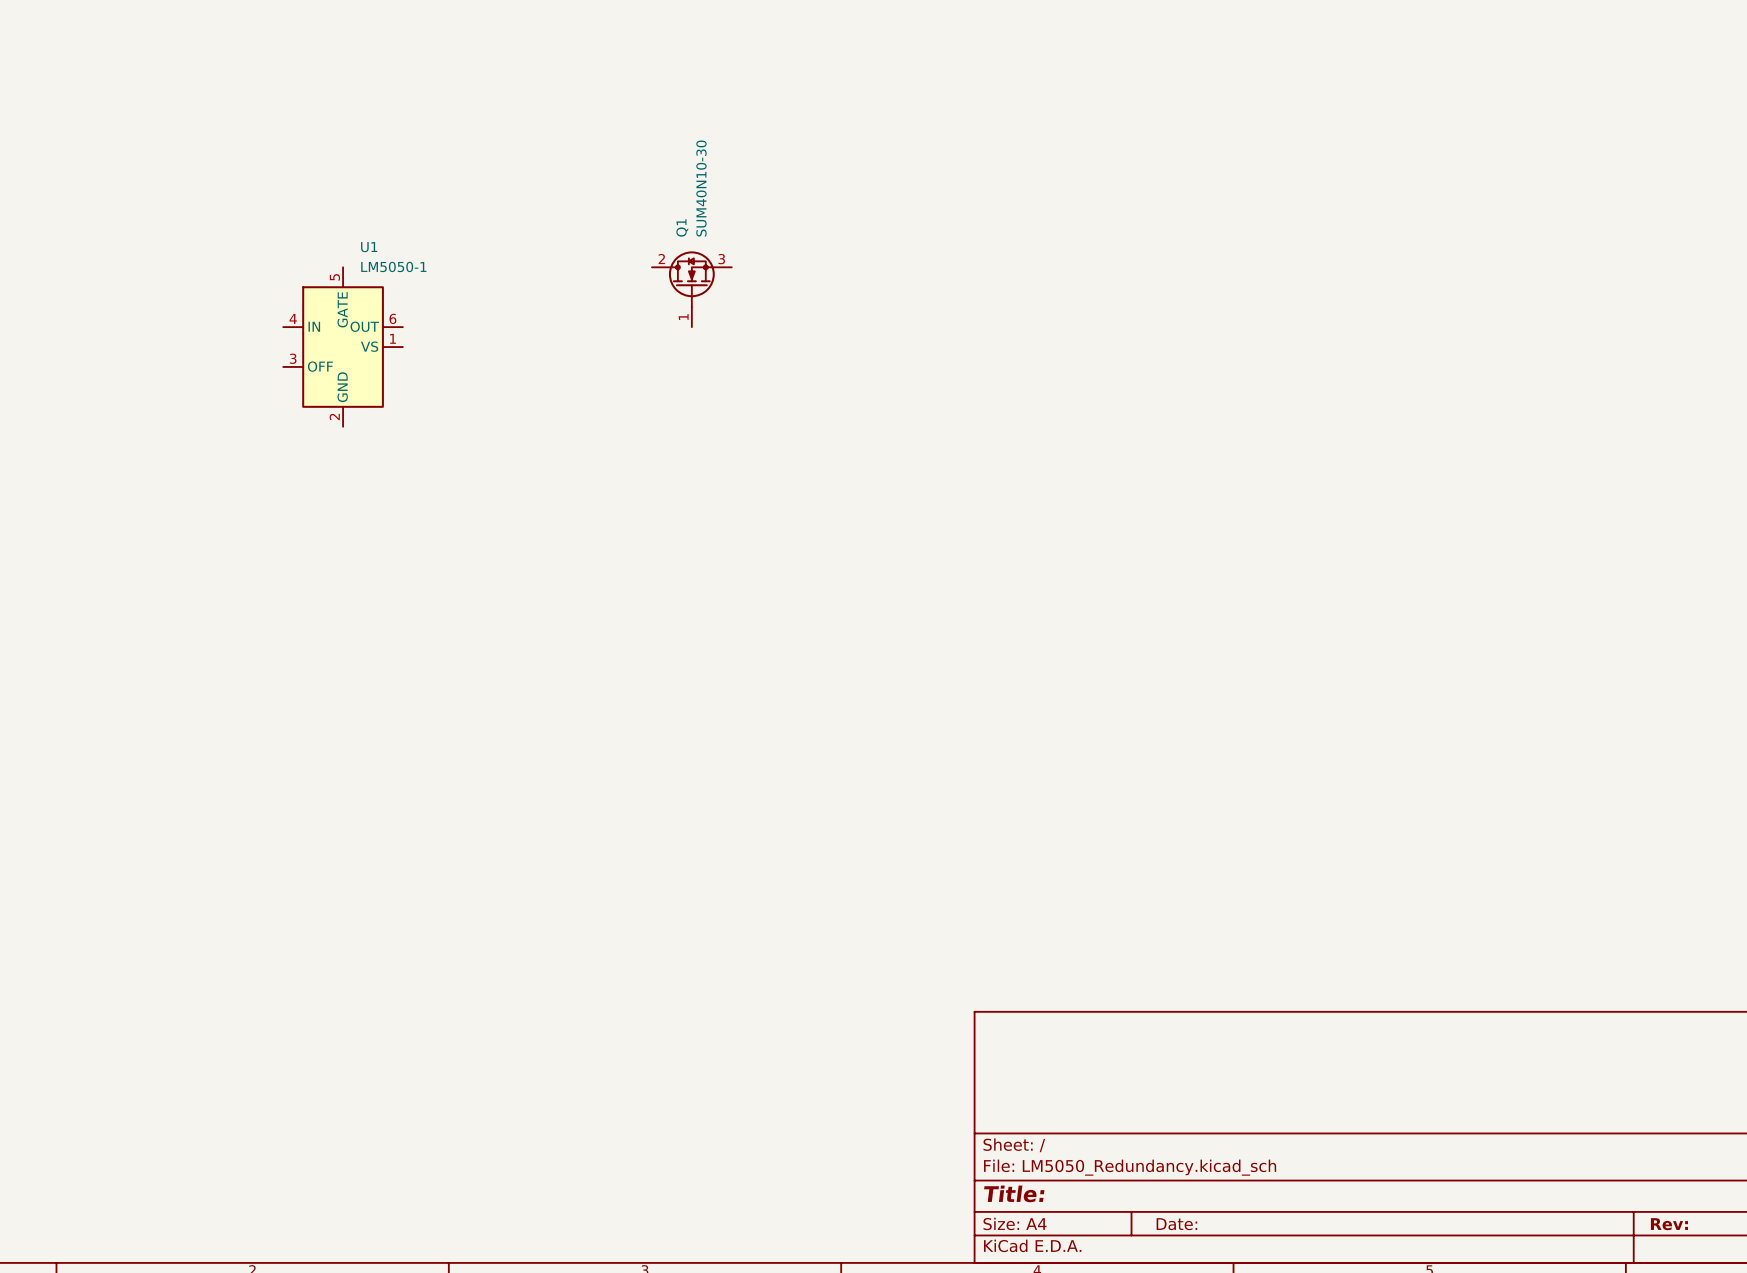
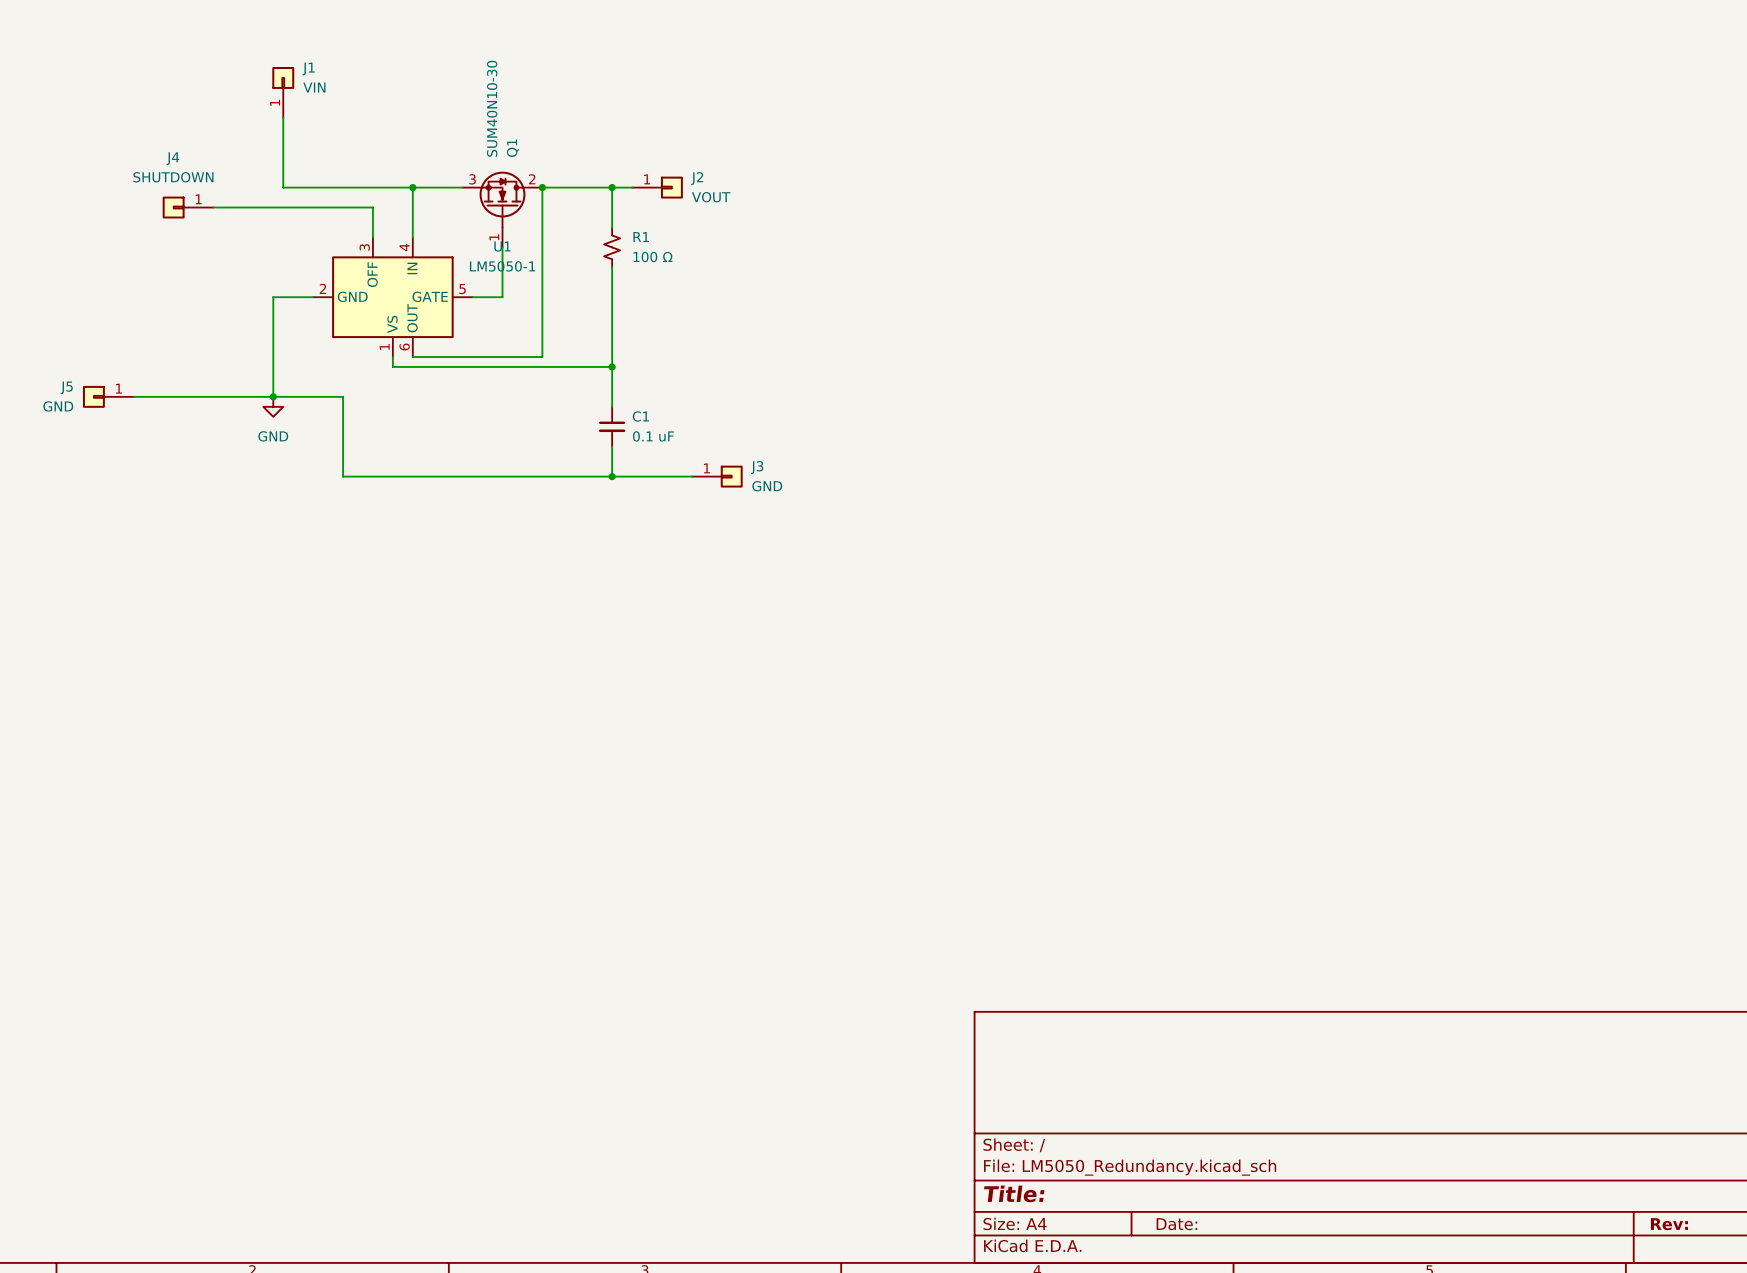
J1: none -> VIN (283, 92)
wire: none -> (283, 117) (283, 187) (462, 187)
wire: none -> (412, 187) (412, 237)
junction: none -> (412, 187)
junction: none -> (542, 187)
wire: none -> (612, 187) (612, 227)
junction: none -> (612, 187)
wire: none -> (632, 187) (542, 187) (542, 357) (412, 357)
J2: none -> VOUT (657, 187)
J4: none -> SHUTDOWN (188, 207)
wire: none -> (213, 207) (372, 207) (372, 237)
U1 name position: U1 (369, 247) -> U1 (502, 246)
wire: none -> (502, 247) (502, 297) (472, 297)
R1: none -> 100 Ω (612, 247)
U1 value position: LM5050-1 (393, 266) -> LM5050-1 (502, 266)
wire: none -> (612, 267) (612, 406)
Q1 flip: as is (691, 279) -> left-right (502, 199)
Q1 position: (691, 289) -> (502, 209)
wire: none -> (313, 297) (273, 297) (273, 396)
U1 rotation: 0° (343, 347) -> 90° clockwise (392, 297)
wire: none -> (392, 357) (392, 366) (612, 366)
junction: none -> (612, 366)
J5: none -> GND (108, 396)
wire: none -> (133, 396) (343, 396) (343, 476) (691, 476)
junction: none -> (273, 396)
power symbol: none -> GND (273, 406)
C1: none -> 0.1 uF (612, 426)
wire: none -> (612, 446) (612, 476)
junction: none -> (612, 476)
J3: none -> GND (717, 476)

